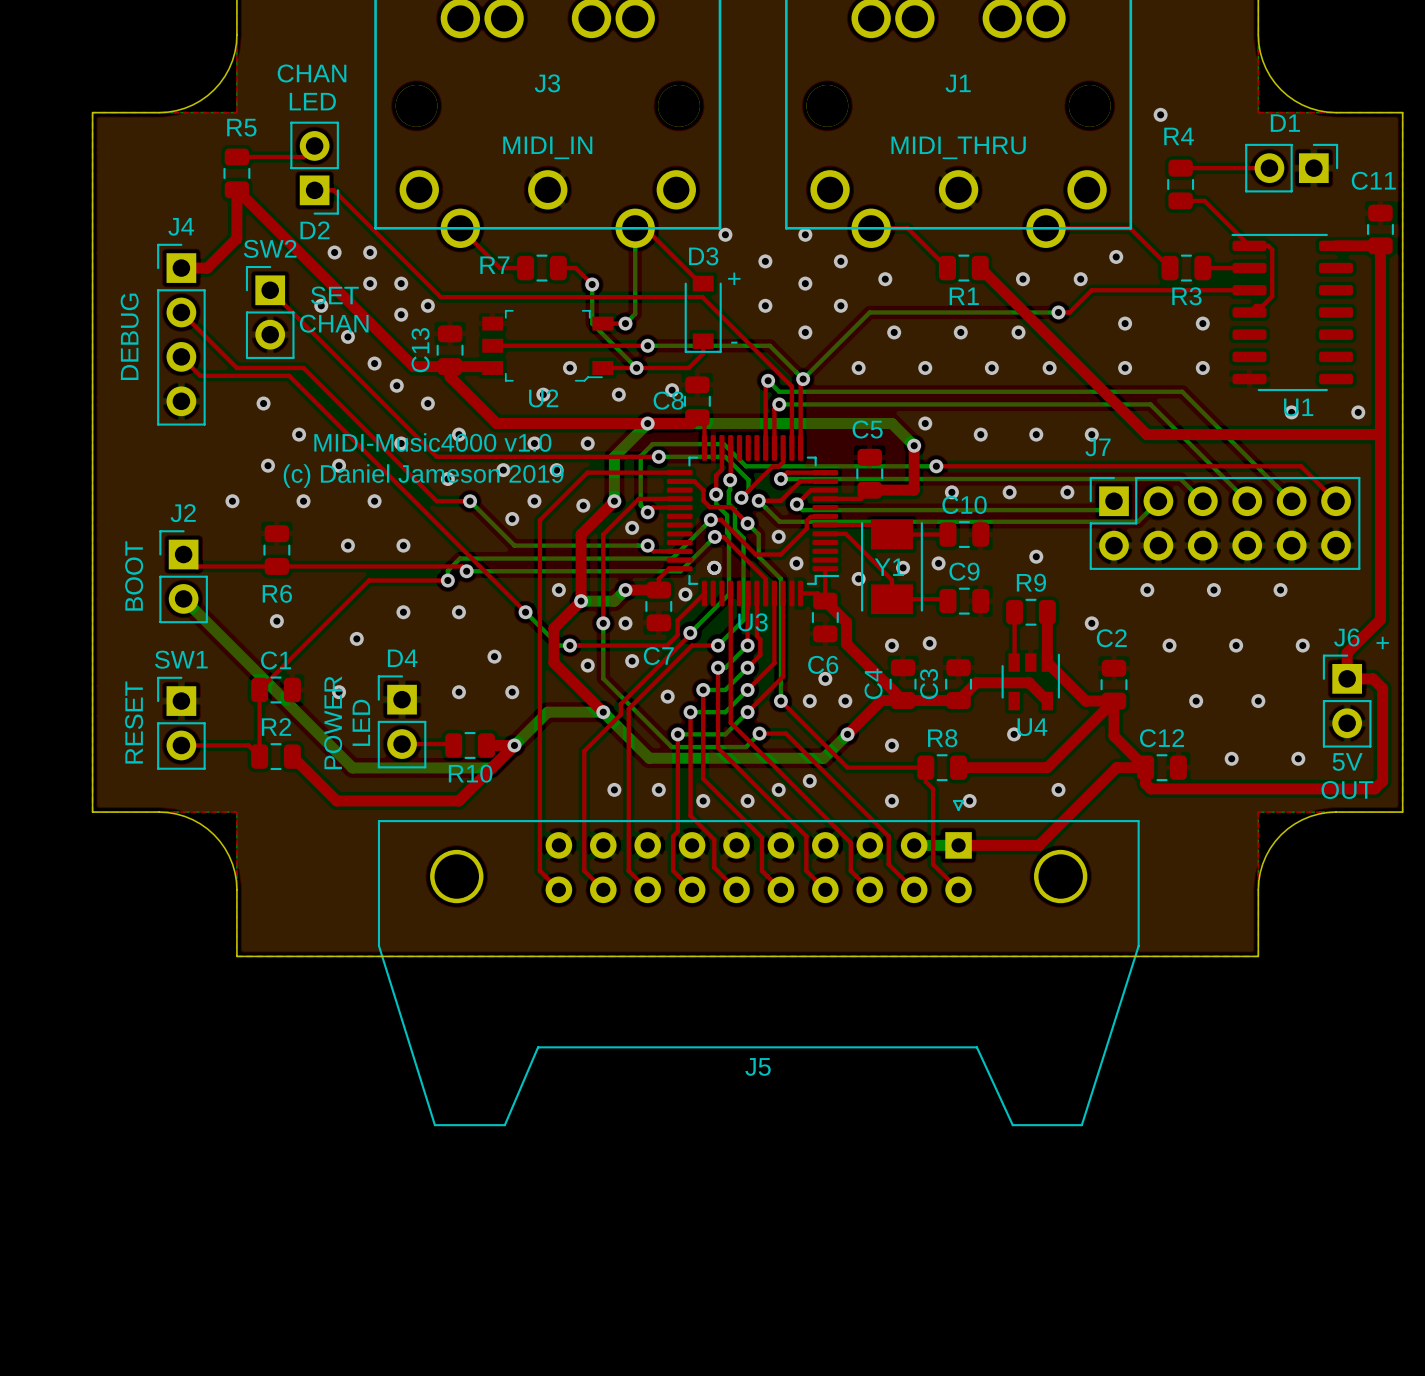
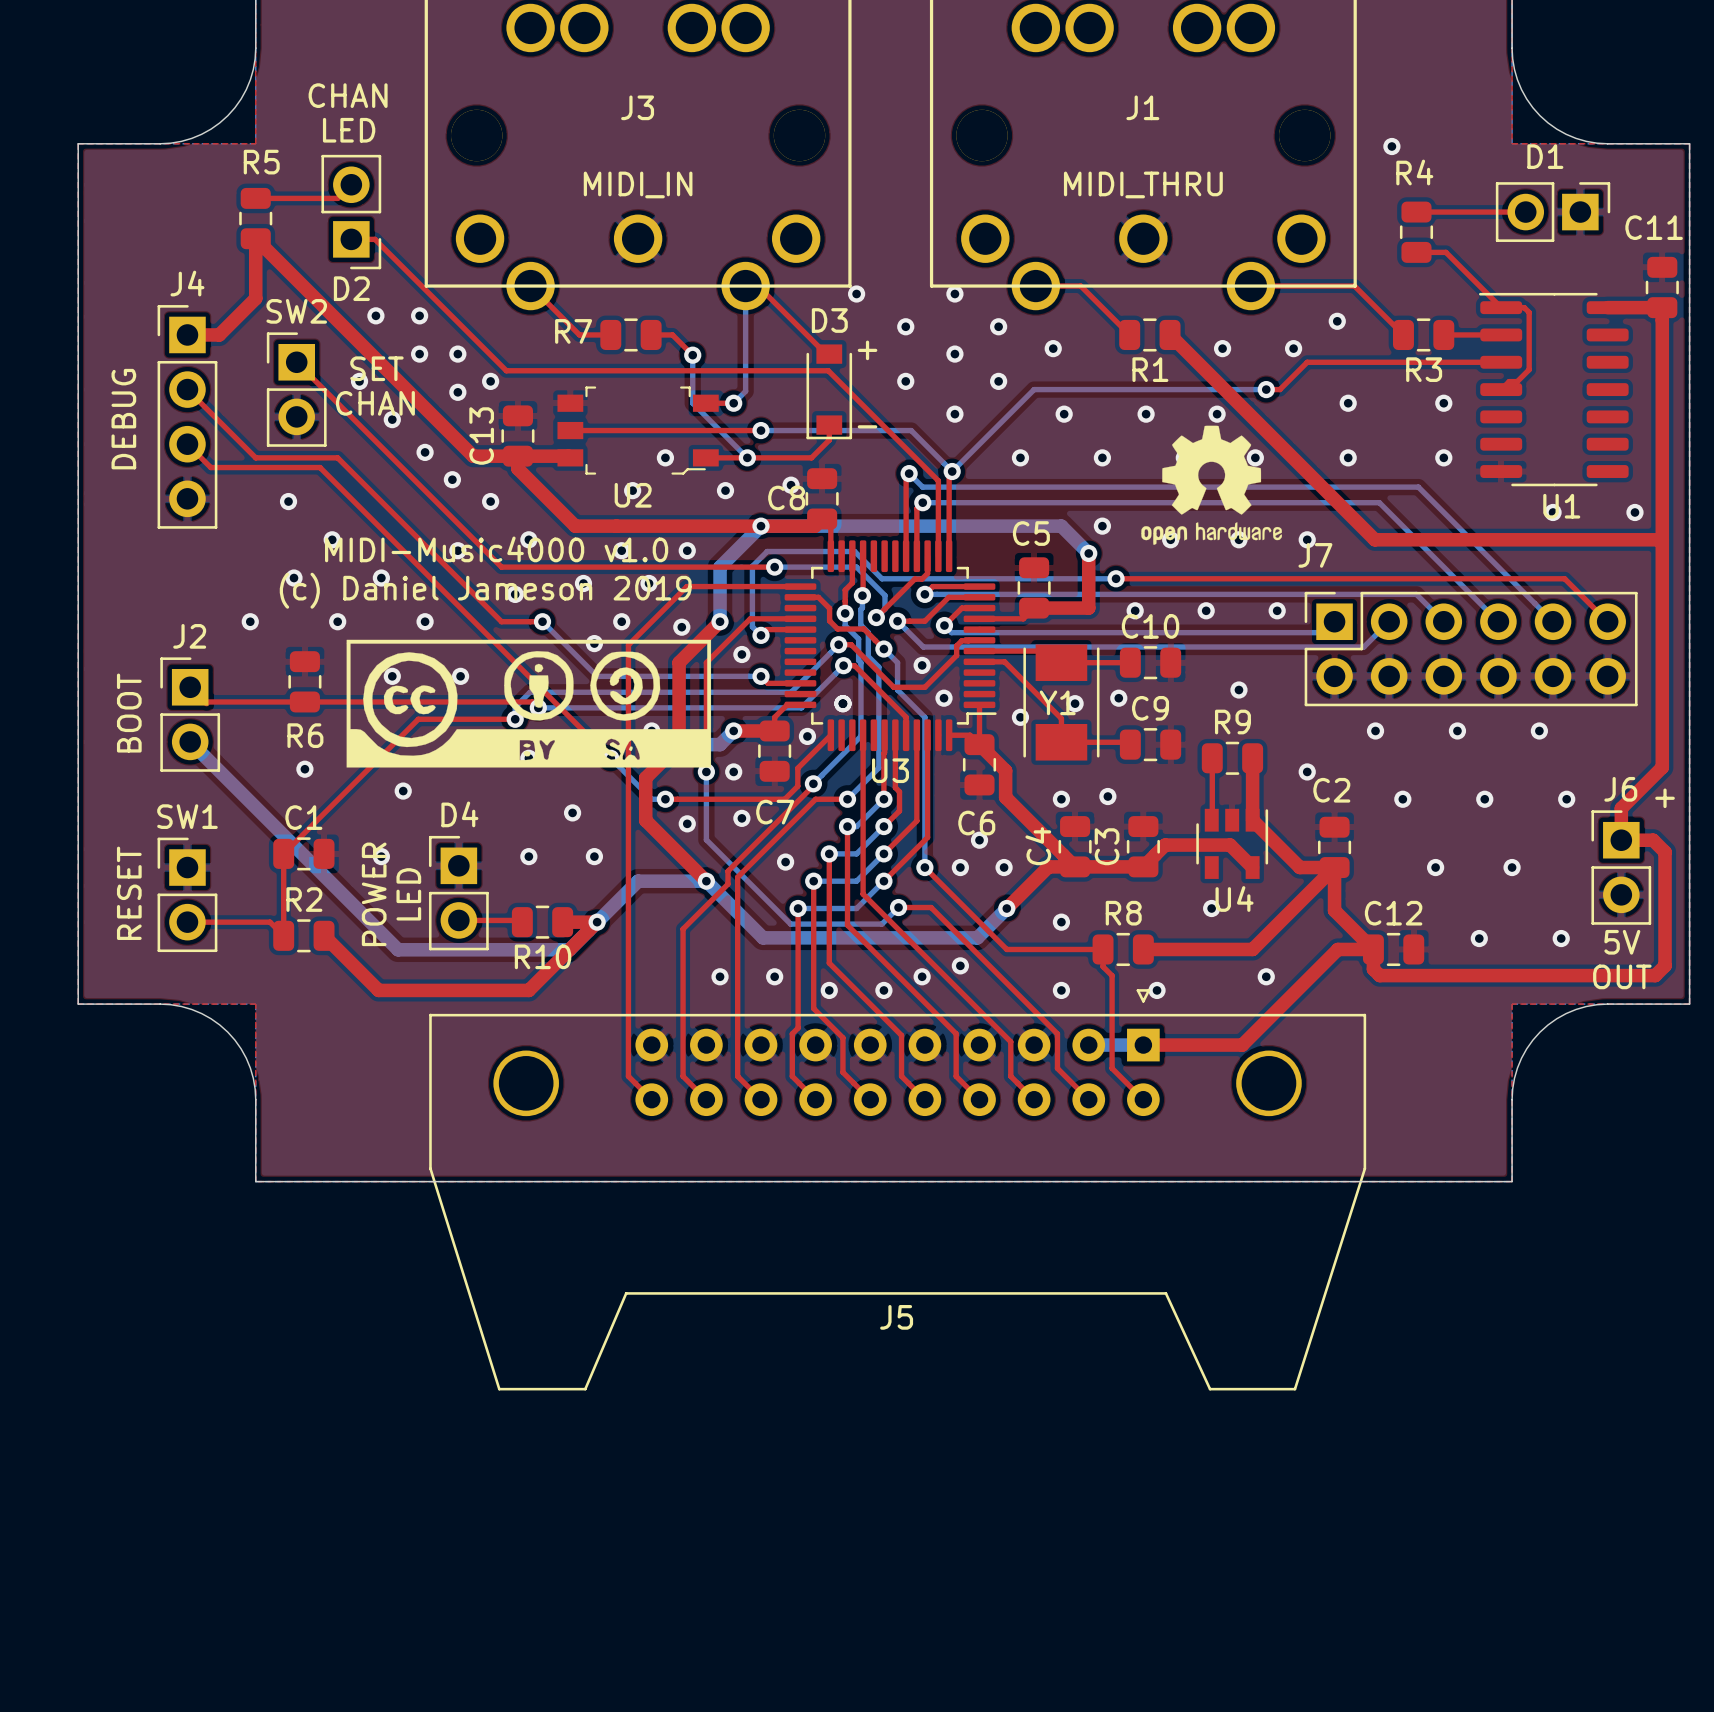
drawing: none -> [1141, 425, 1282, 545]
drawing: none -> [346, 639, 712, 768]

